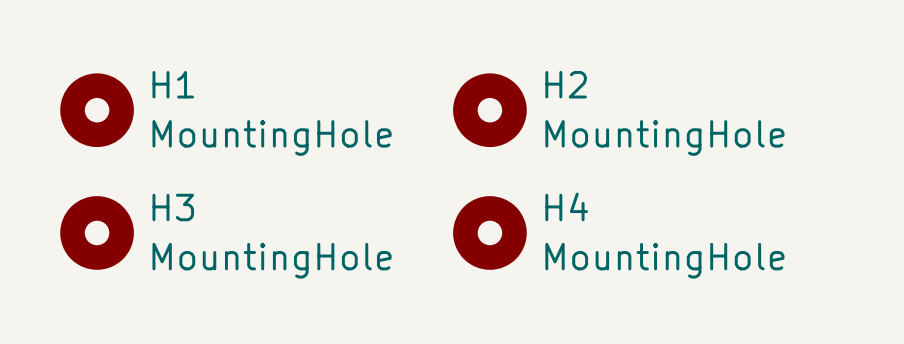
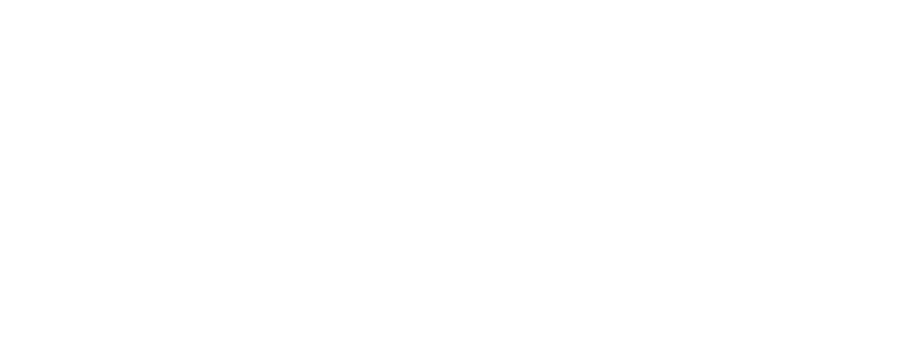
H1: MountingHole (97, 110) -> none
H2: MountingHole (489, 110) -> none
H3: MountingHole (97, 232) -> none
H4: MountingHole (489, 232) -> none

